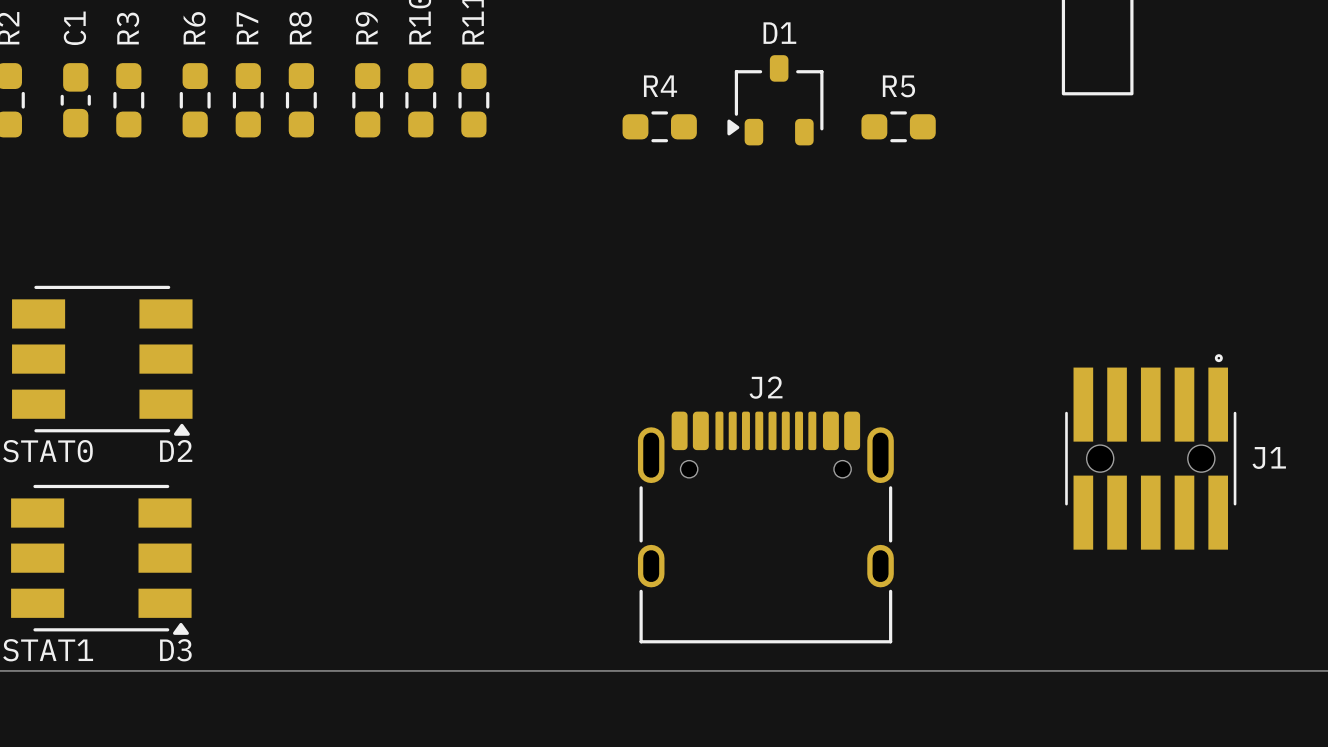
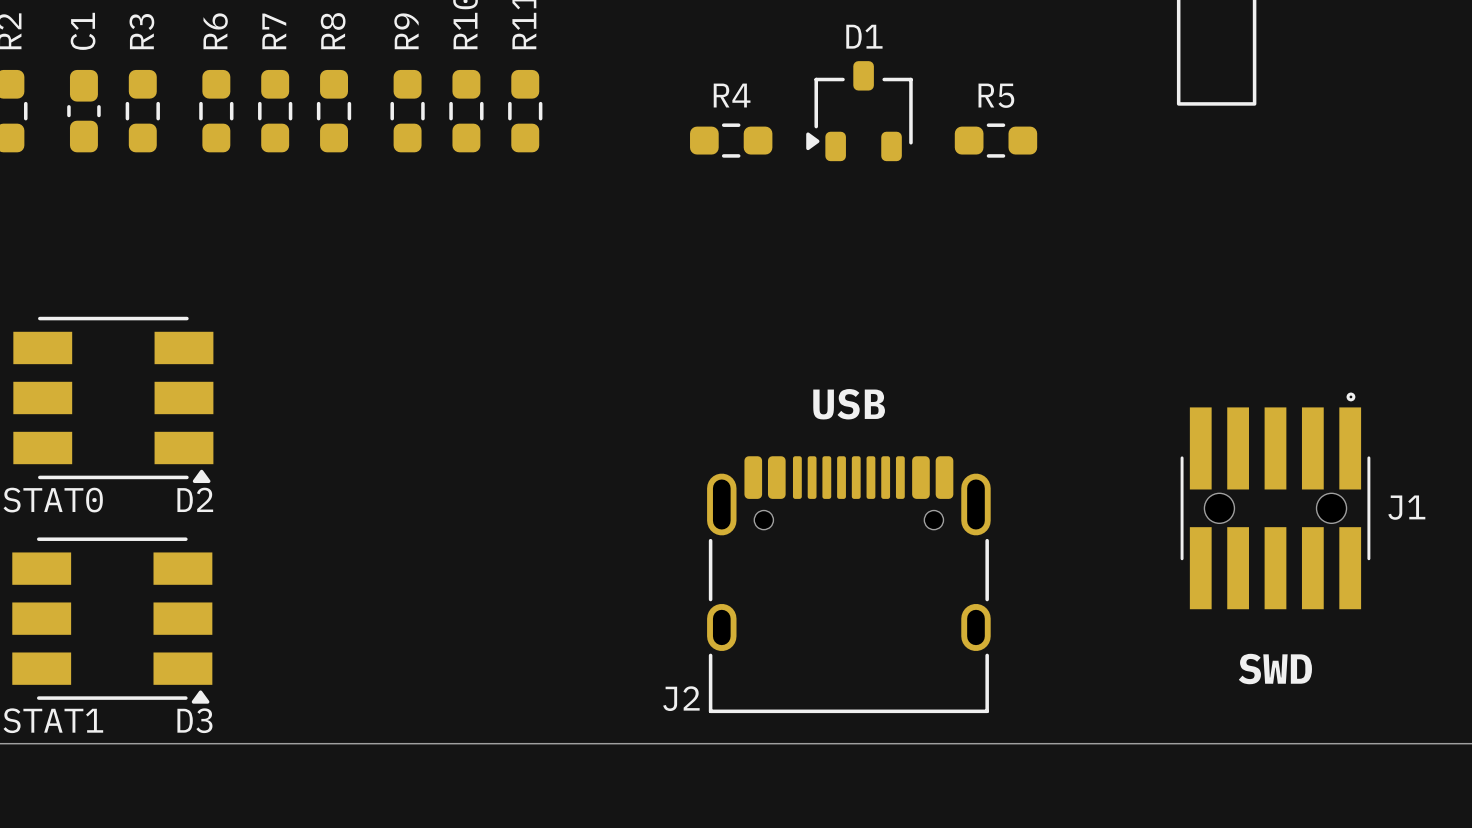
text: none -> USB (849, 404)
J2 name position: J2 (766, 387) -> J2 (681, 698)
text: none -> SWD (1275, 669)

